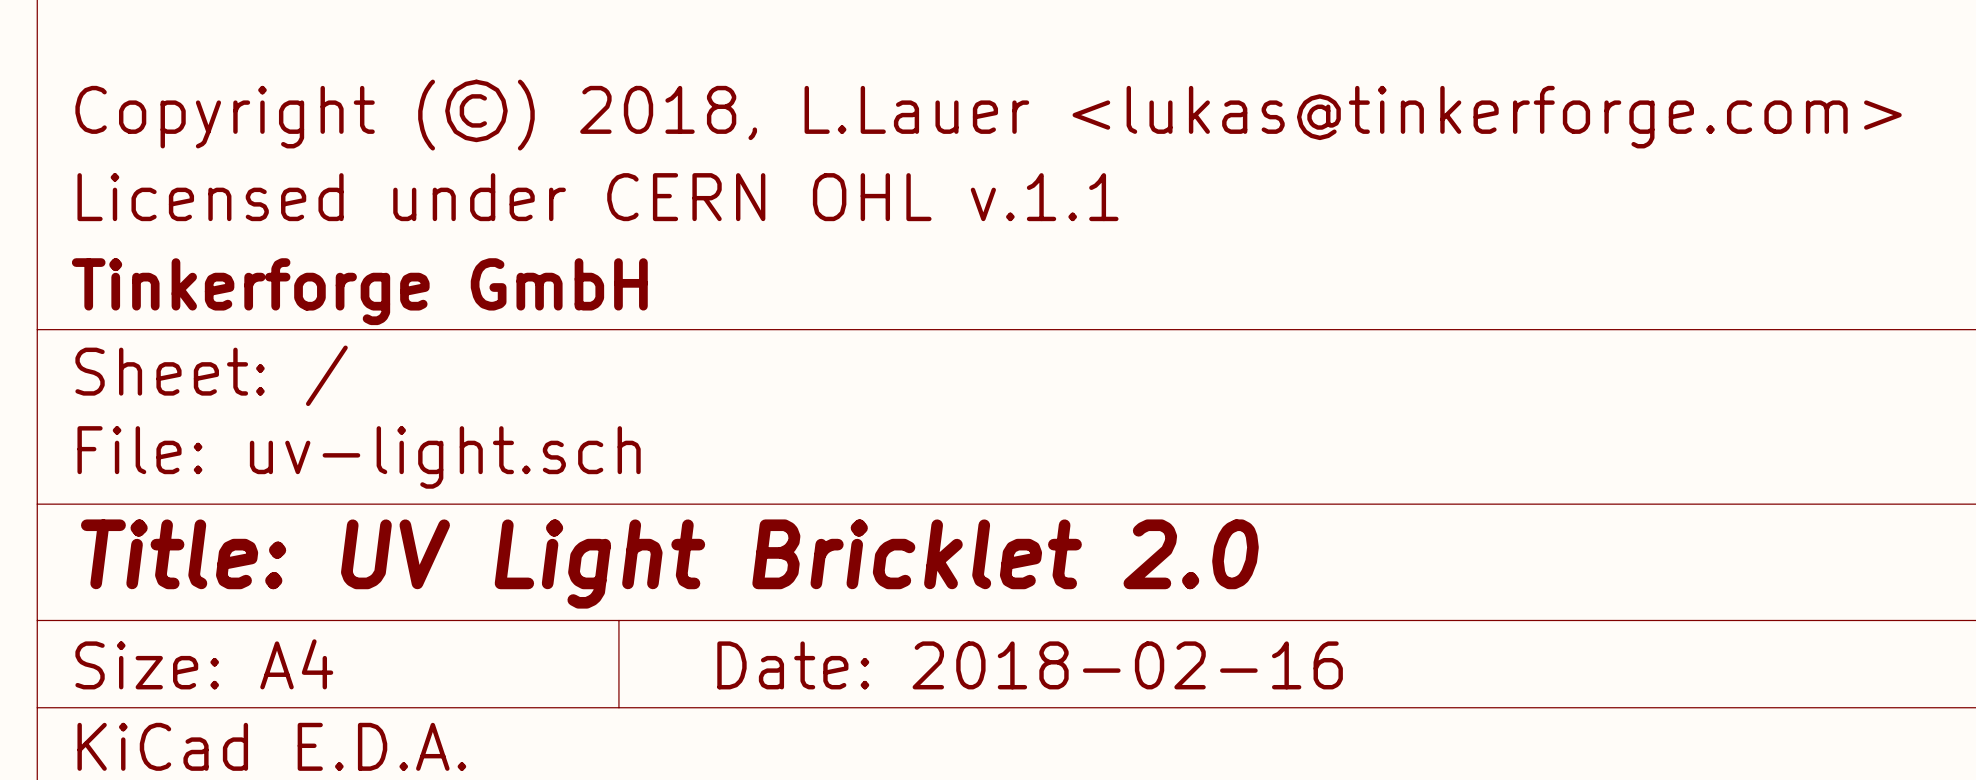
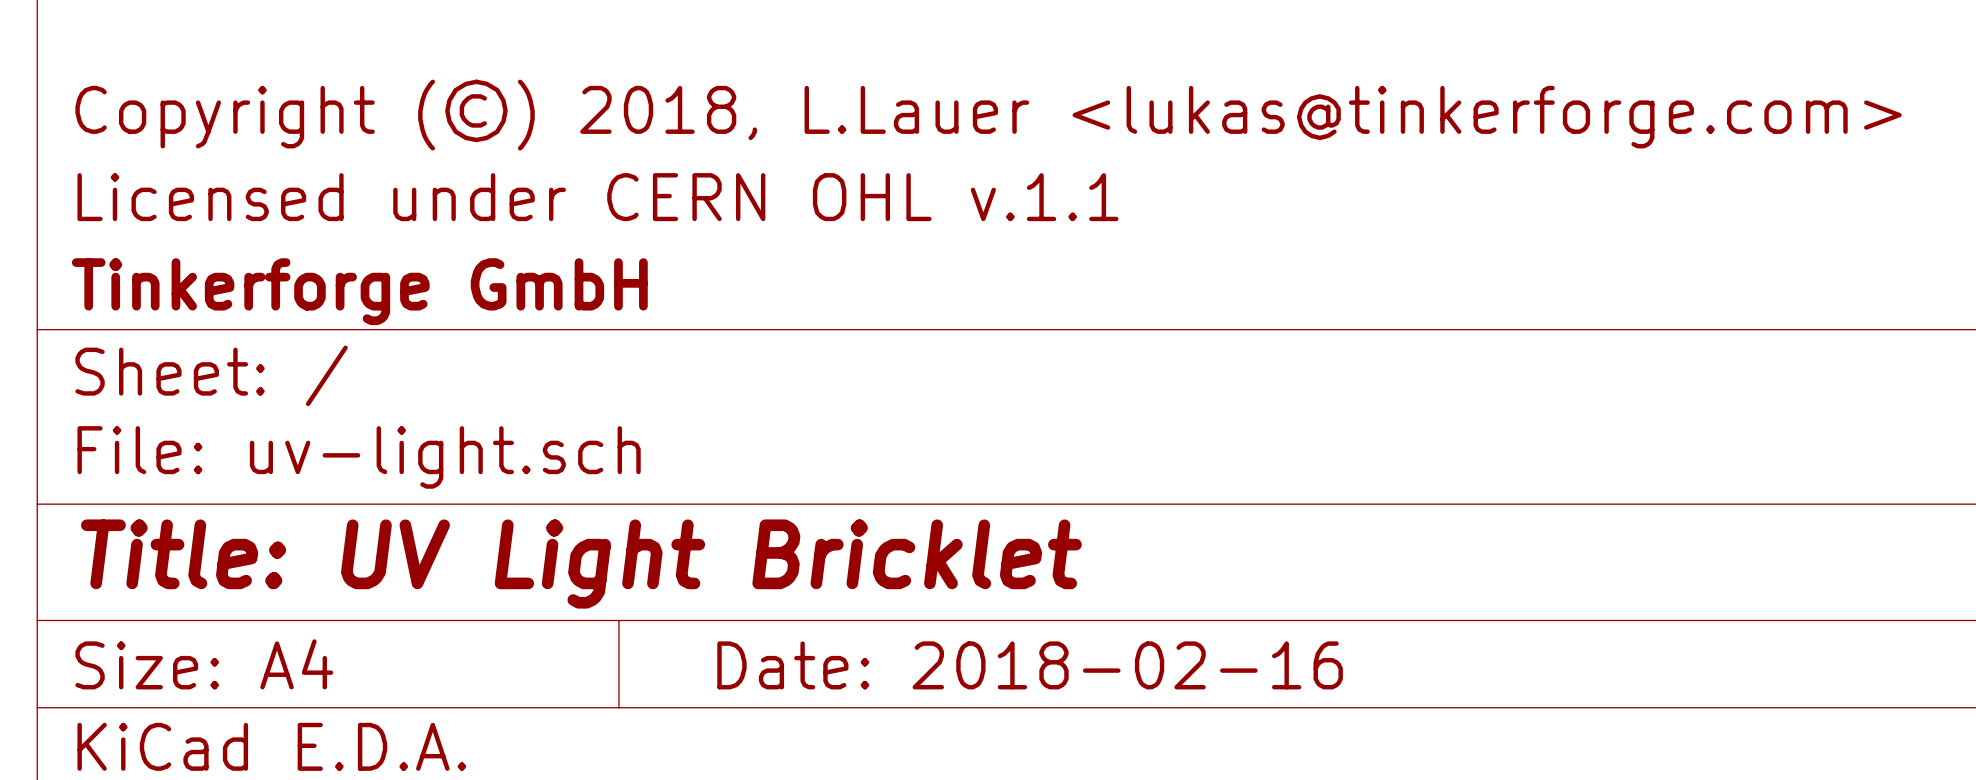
title block: Title: UV Light Bricklet 2.0 (669, 564) -> Title: UV Light Bricklet (581, 564)

